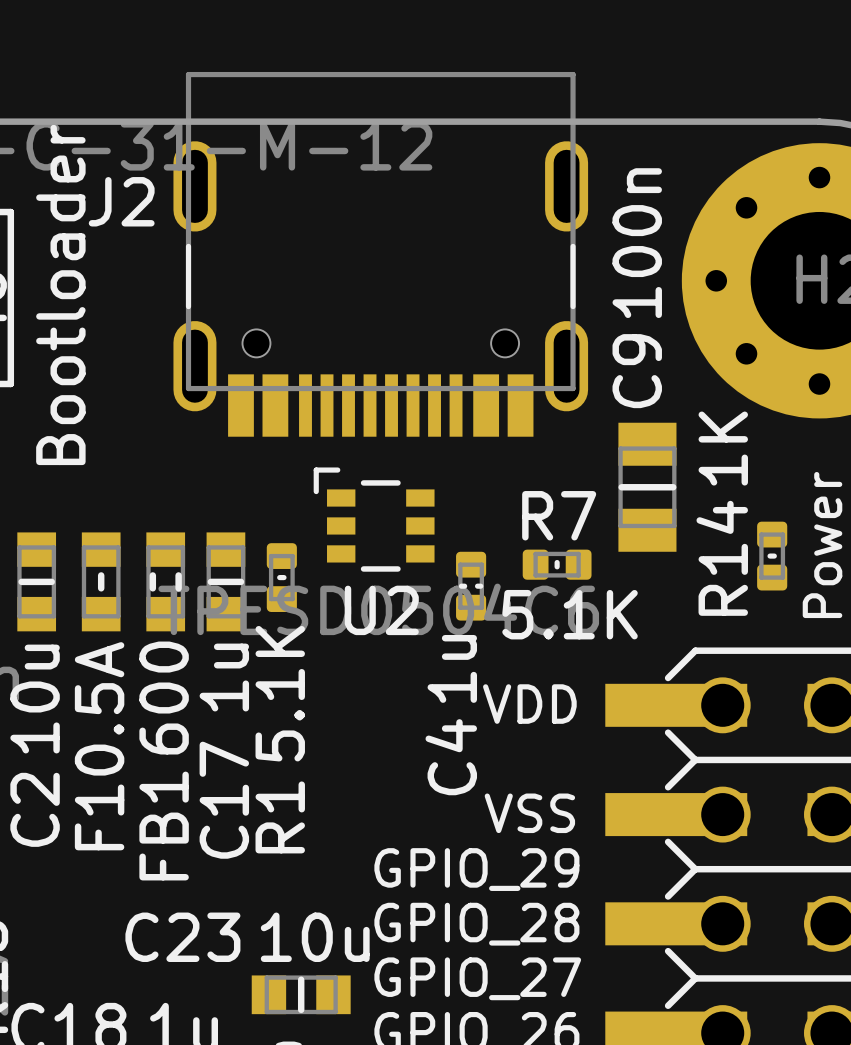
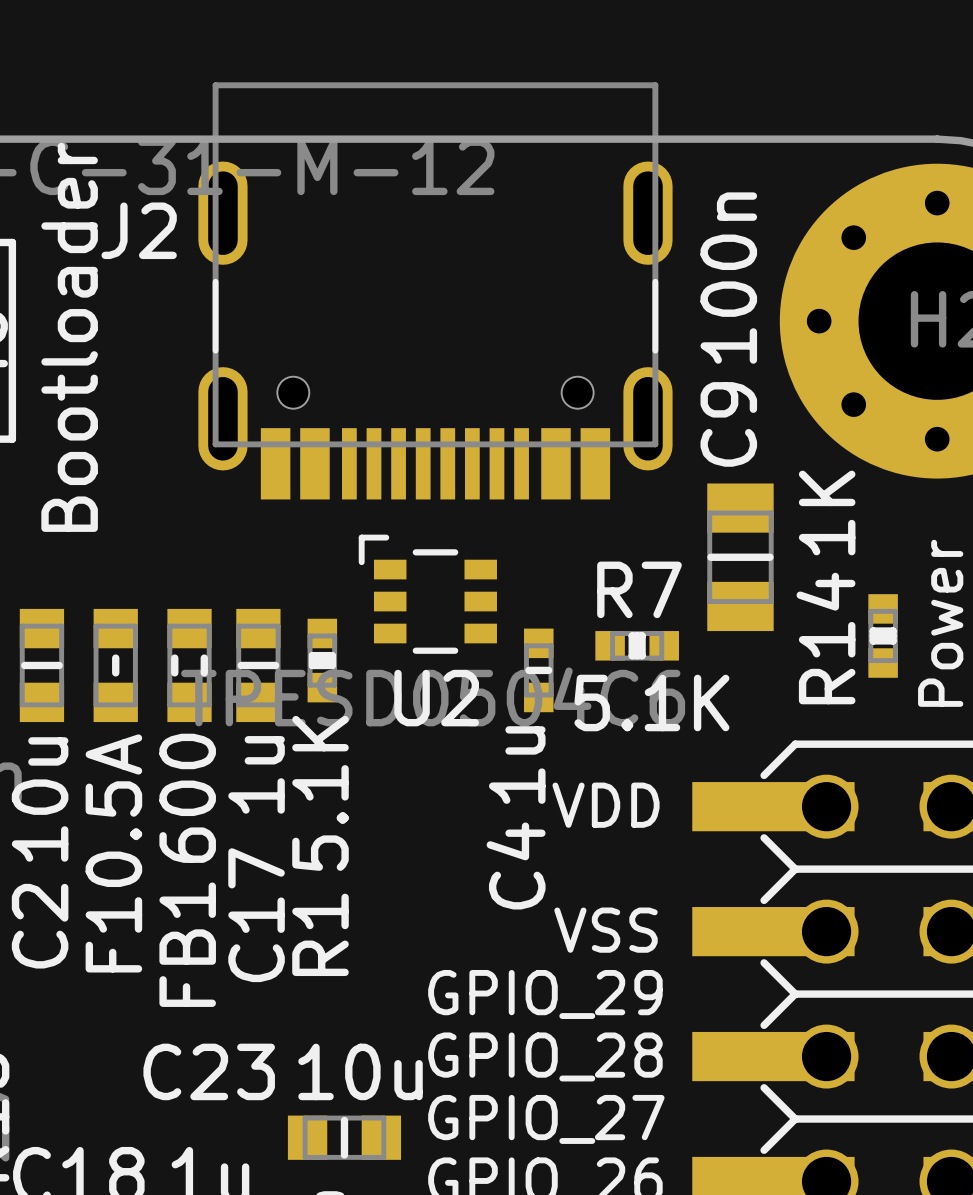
R14 footprint: [757, 521, 788, 591] -> [868, 594, 898, 678]
R1 footprint: [266, 543, 297, 612] -> [307, 618, 338, 703]
R7 footprint: [522, 549, 592, 580] -> [595, 631, 679, 661]
C4 footprint: [456, 551, 487, 621] -> [524, 628, 554, 713]

